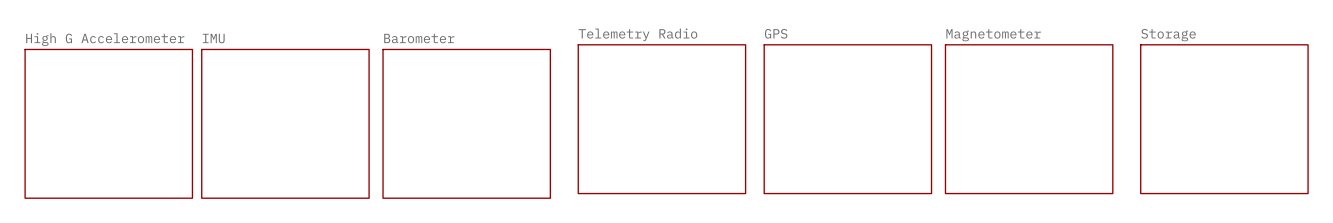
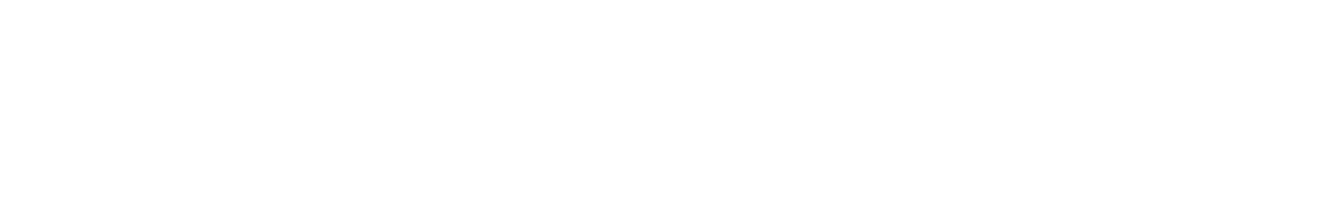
sheet Telemetry Radio: (661, 119) -> none
sheet GPS: (847, 119) -> none
sheet Magnetometer: (1029, 119) -> none
sheet Storage: (1224, 119) -> none
sheet High G Accelerometer: (108, 123) -> none
sheet IMU: (285, 123) -> none
sheet Barometer: (466, 123) -> none

